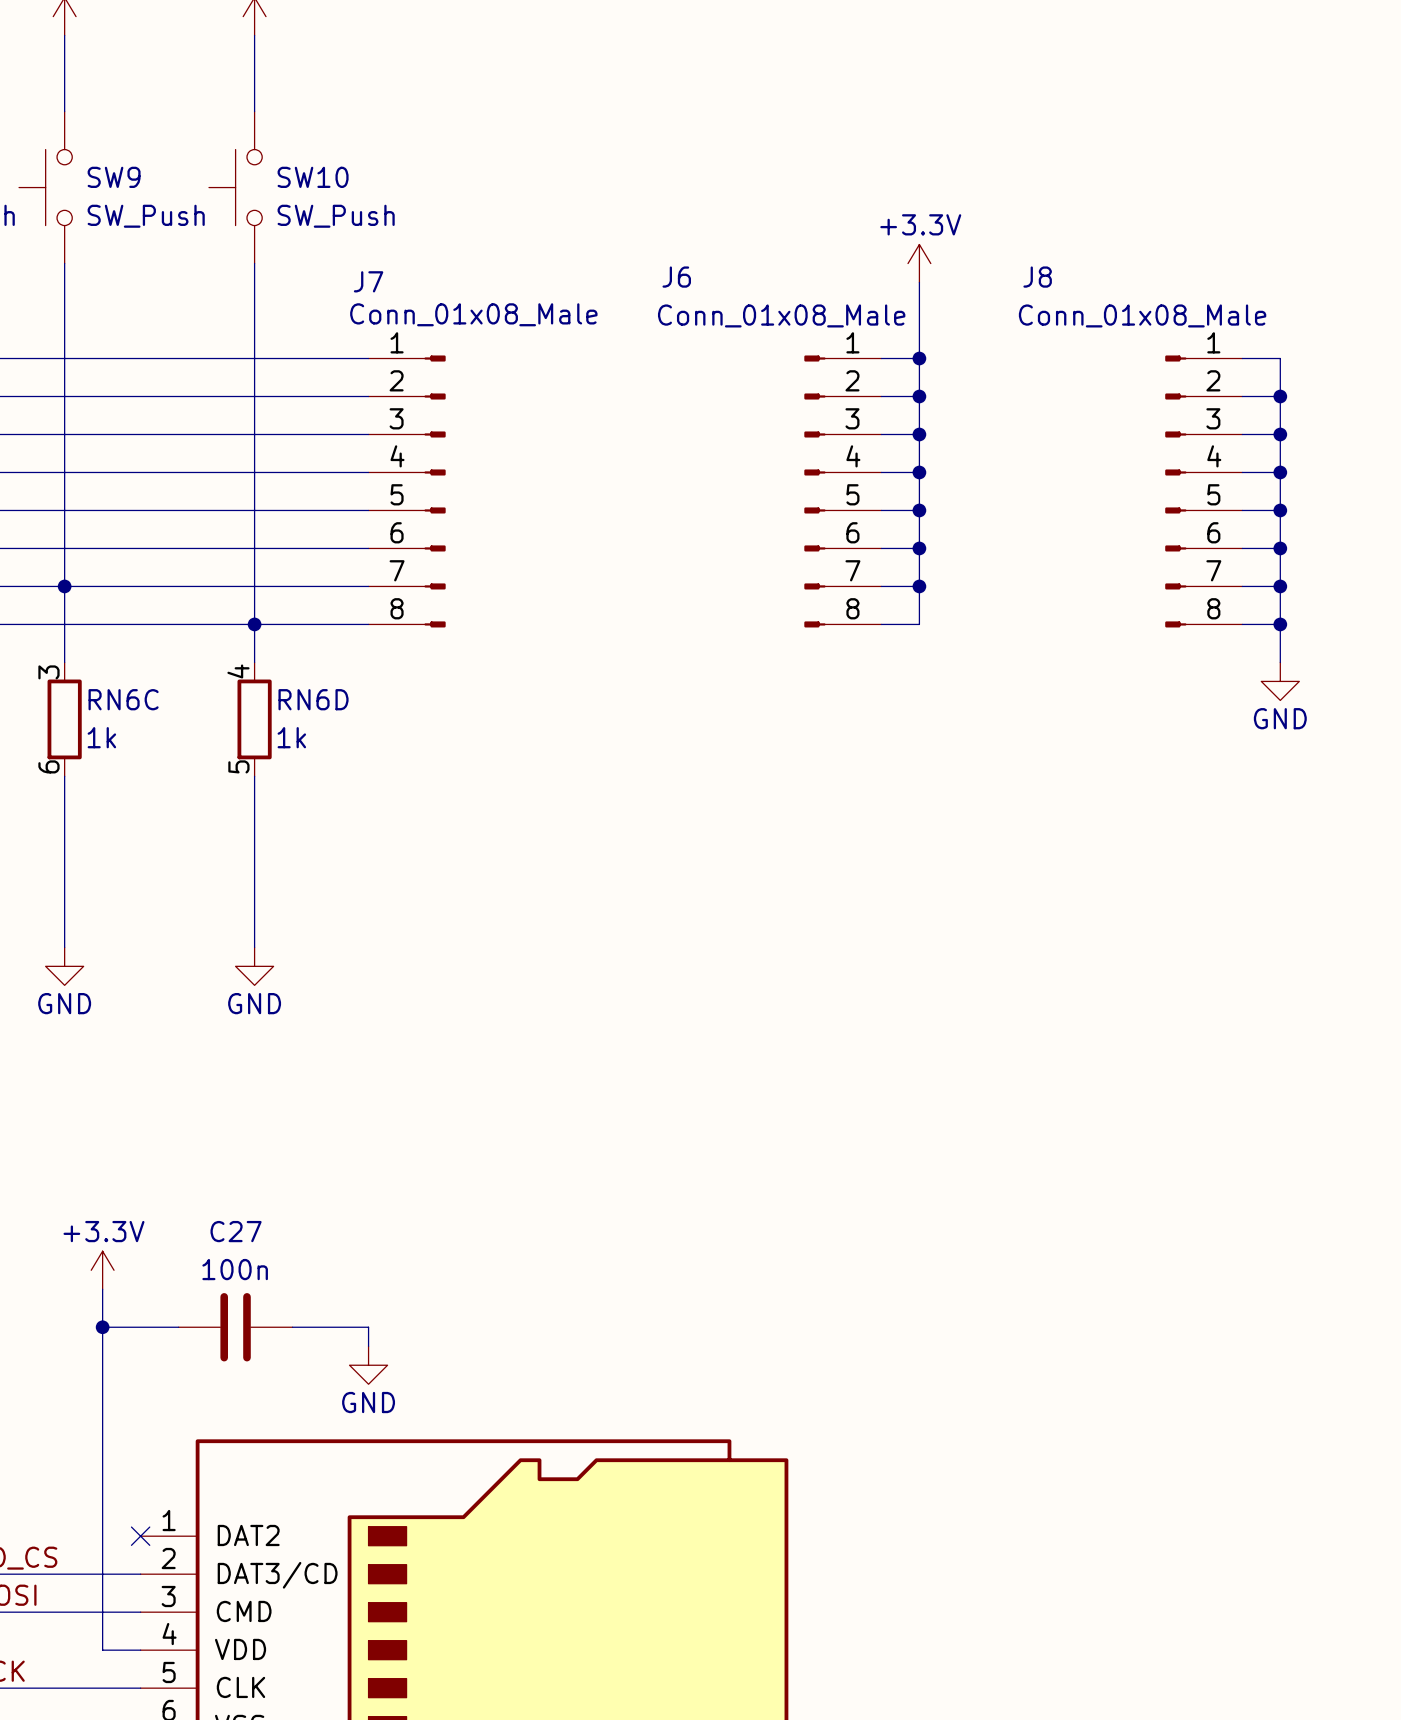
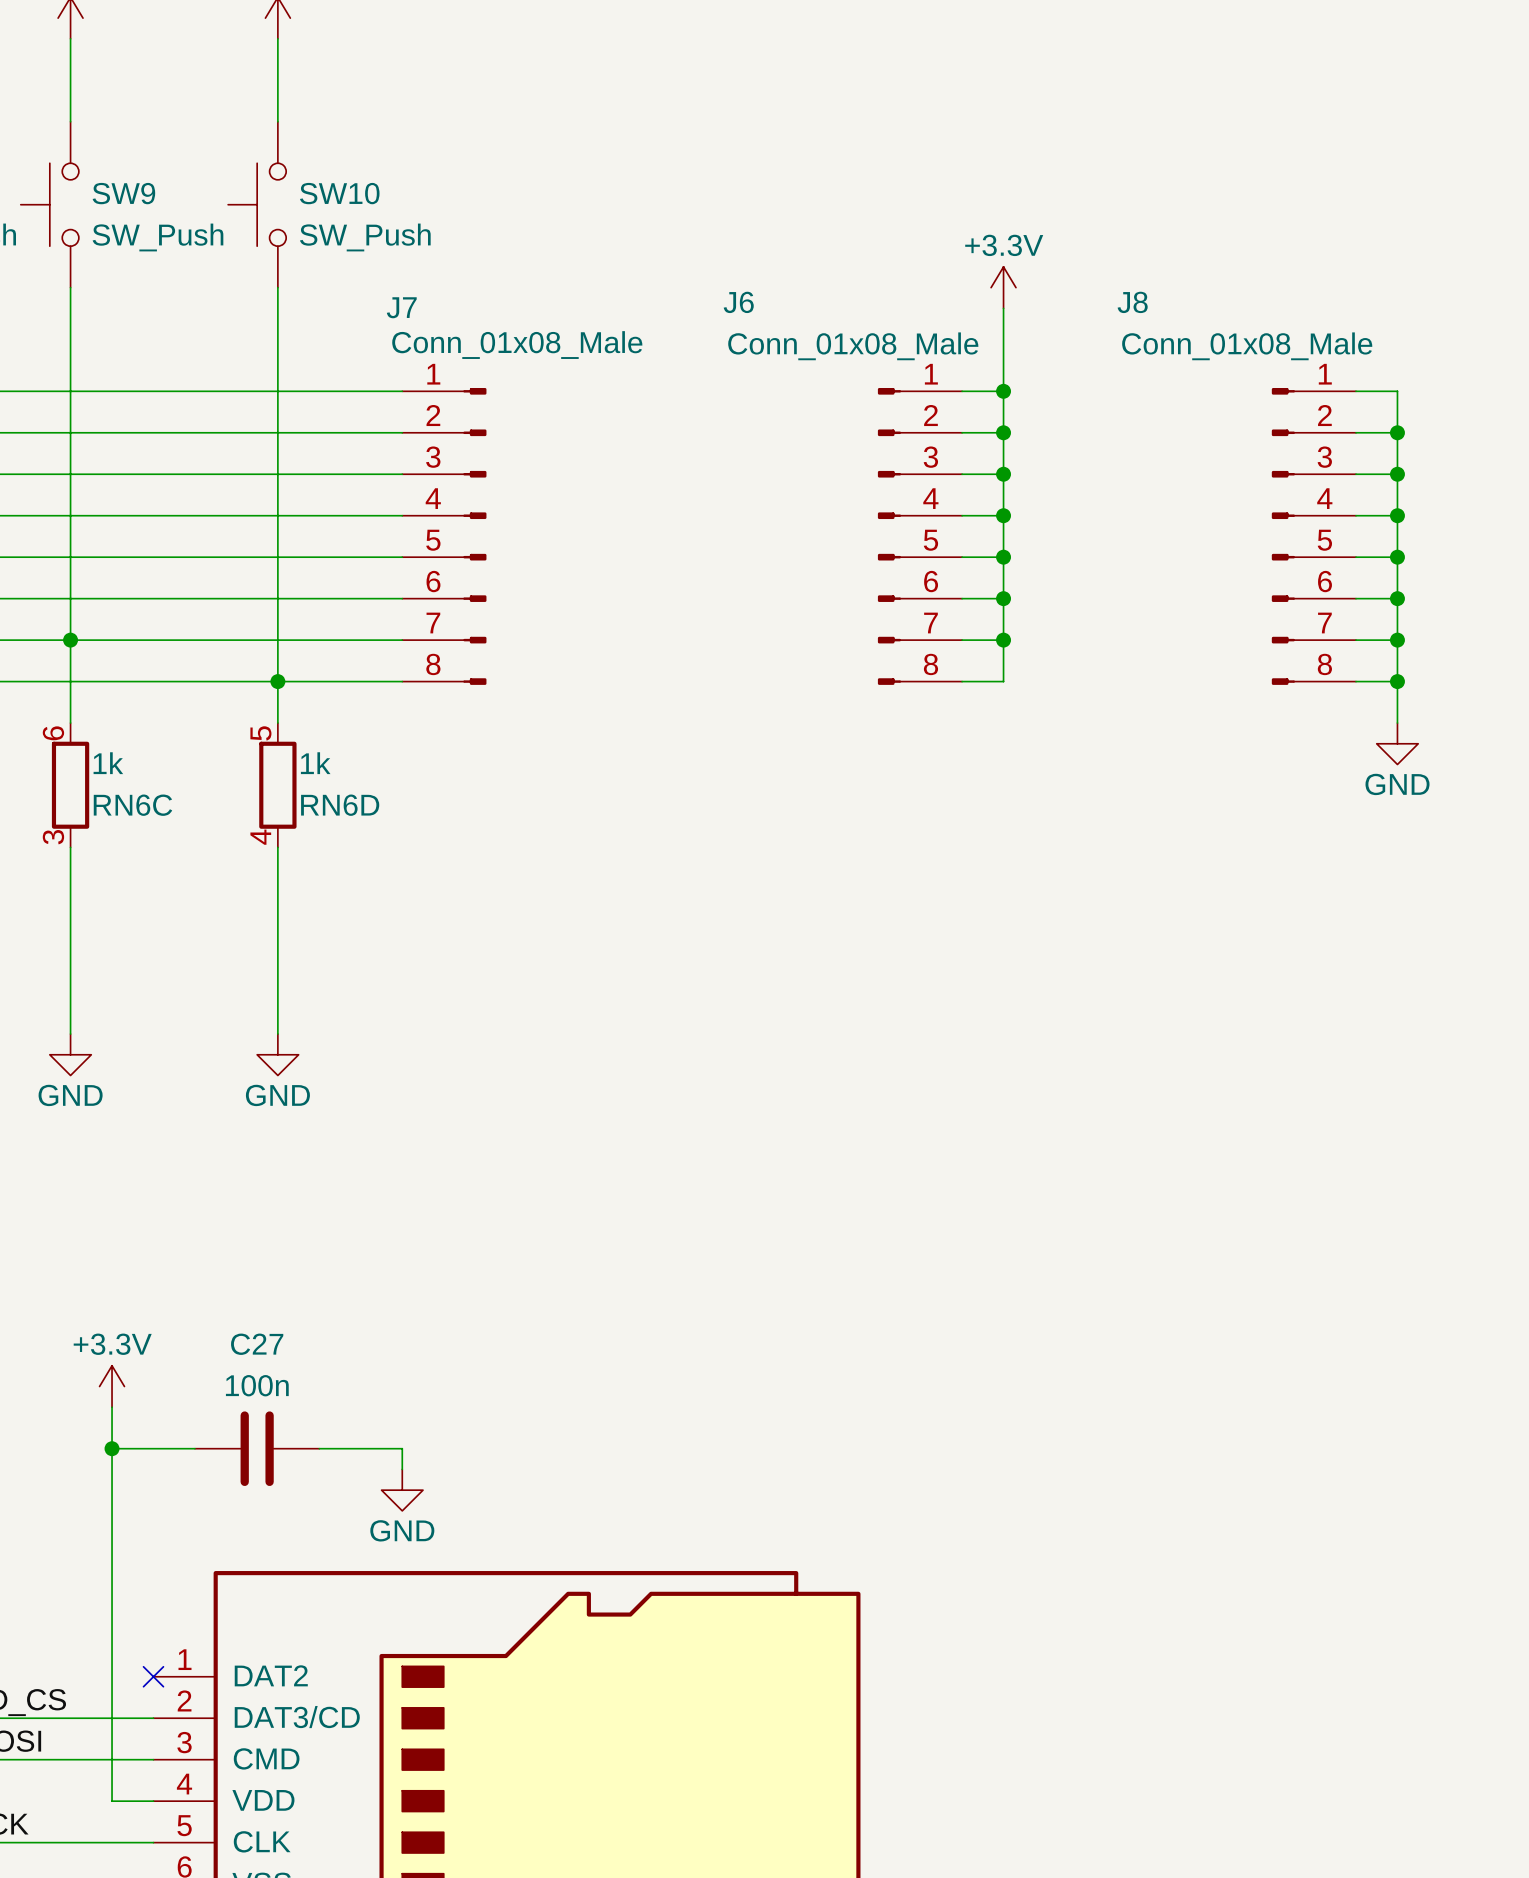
RN6C name position: RN6C (123, 699) -> RN6C (132, 805)
RN6D name position: RN6D (313, 699) -> RN6D (340, 805)
RN6C rotation: 0° (64, 719) -> 180° (70, 785)
RN6D rotation: 0° (254, 719) -> 180° (277, 785)
RN6C value position: 1k (101, 737) -> 1k (108, 763)
RN6D value position: 1k (291, 737) -> 1k (315, 763)

